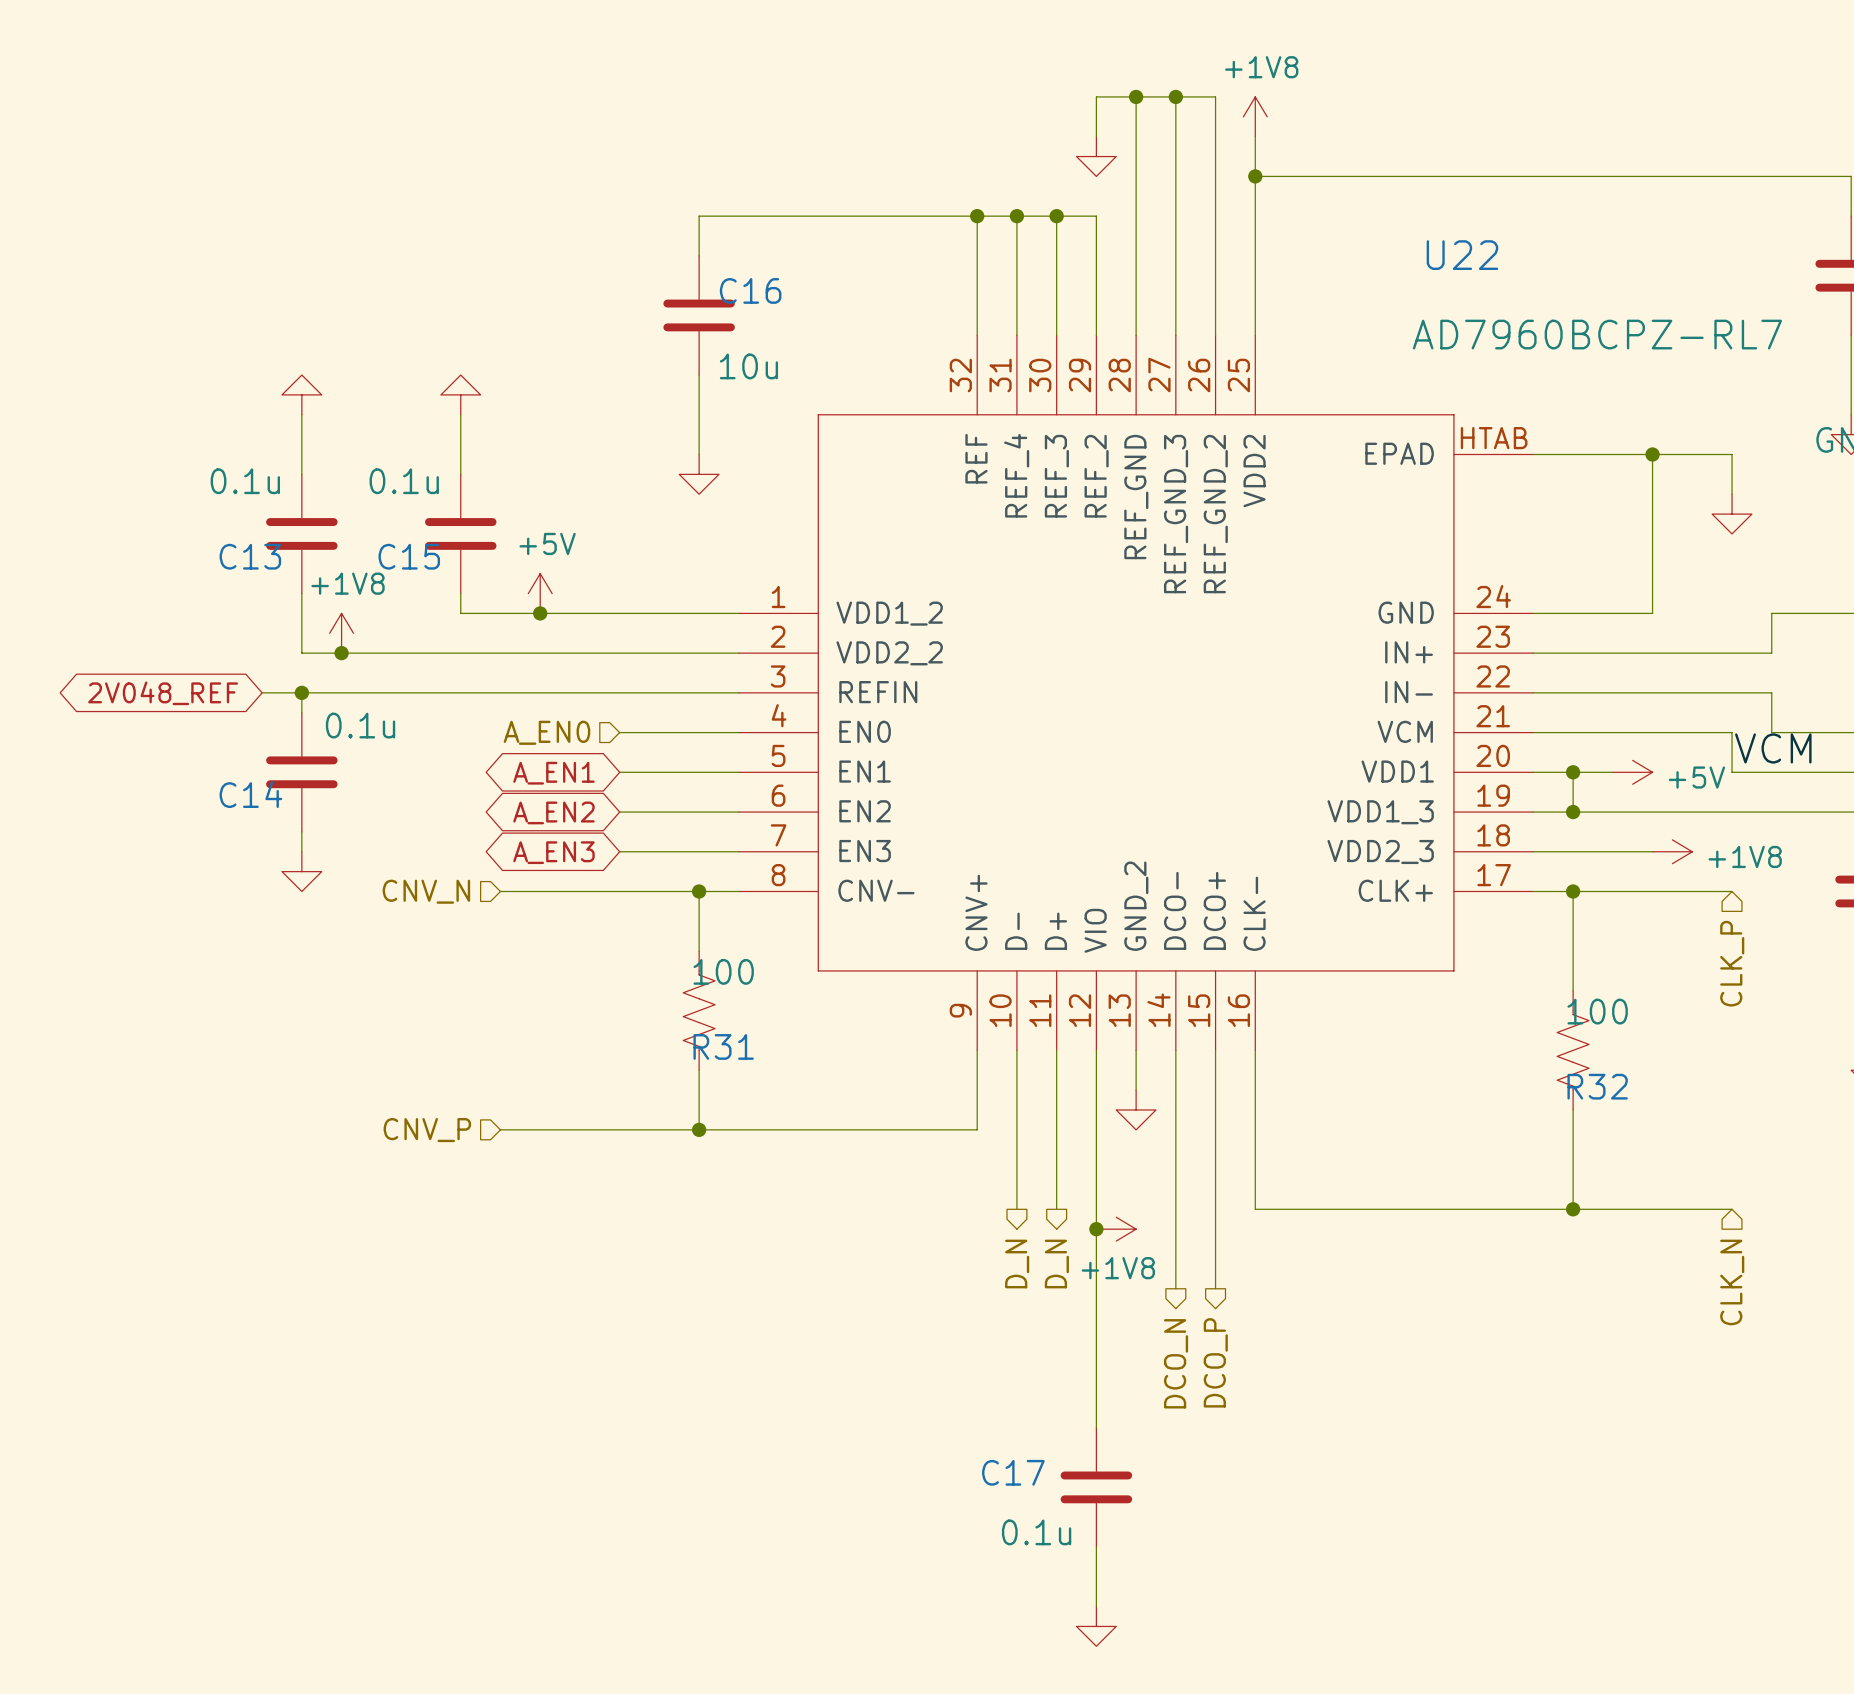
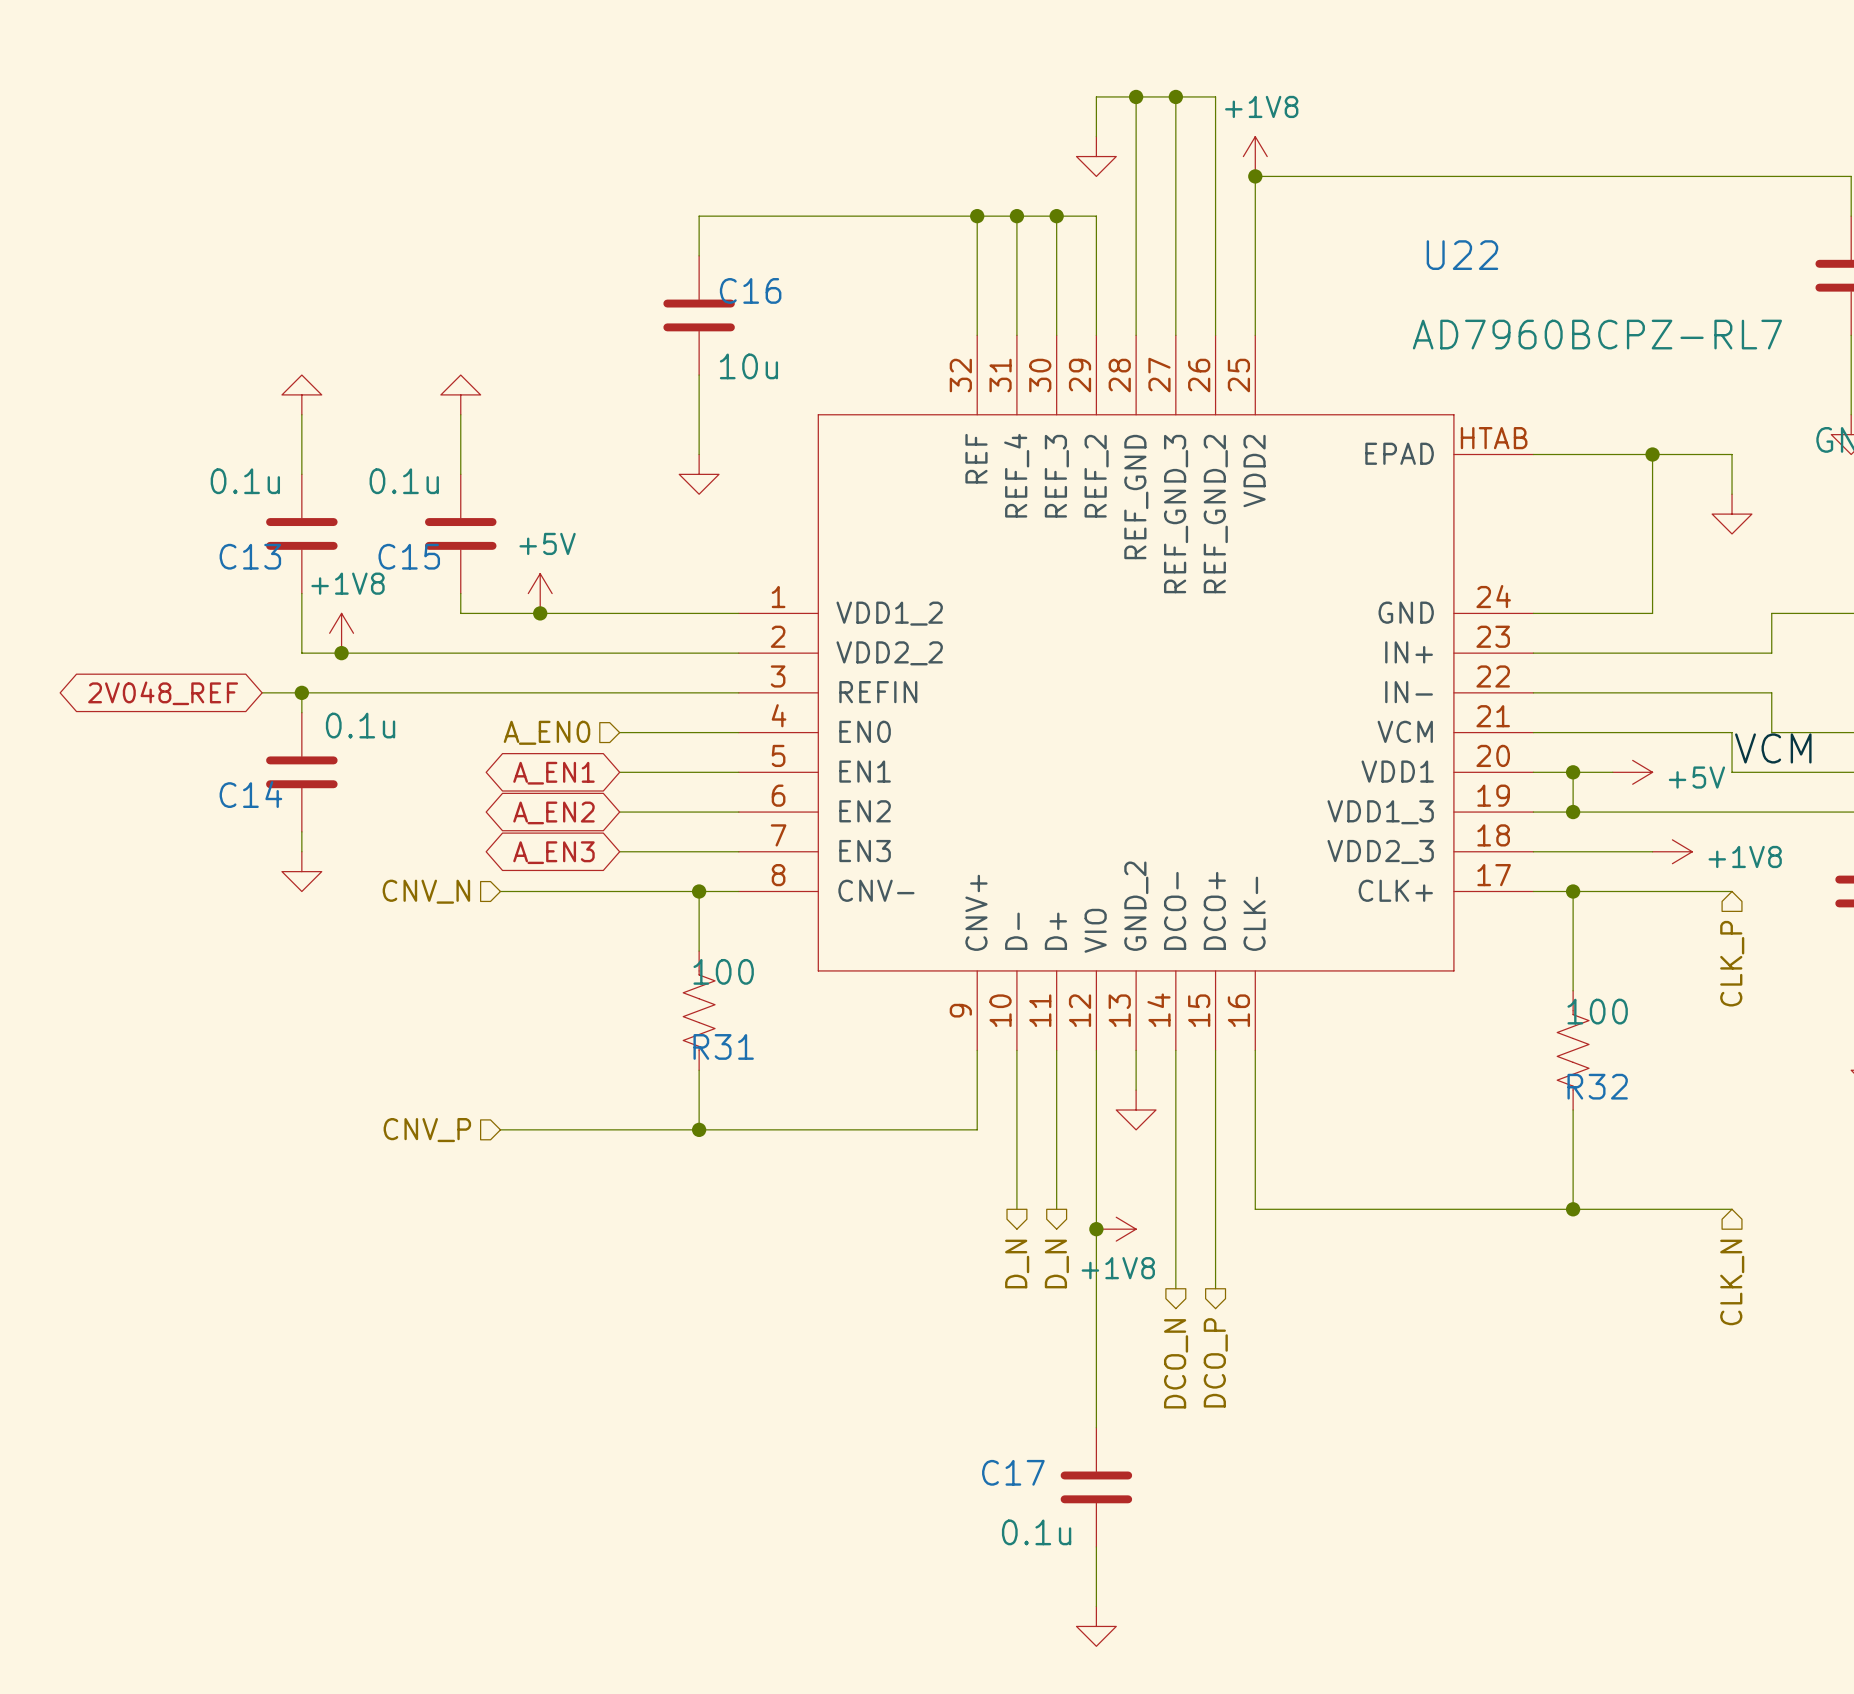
power symbol position: +1V8 (1255, 116) -> +1V8 (1255, 156)

